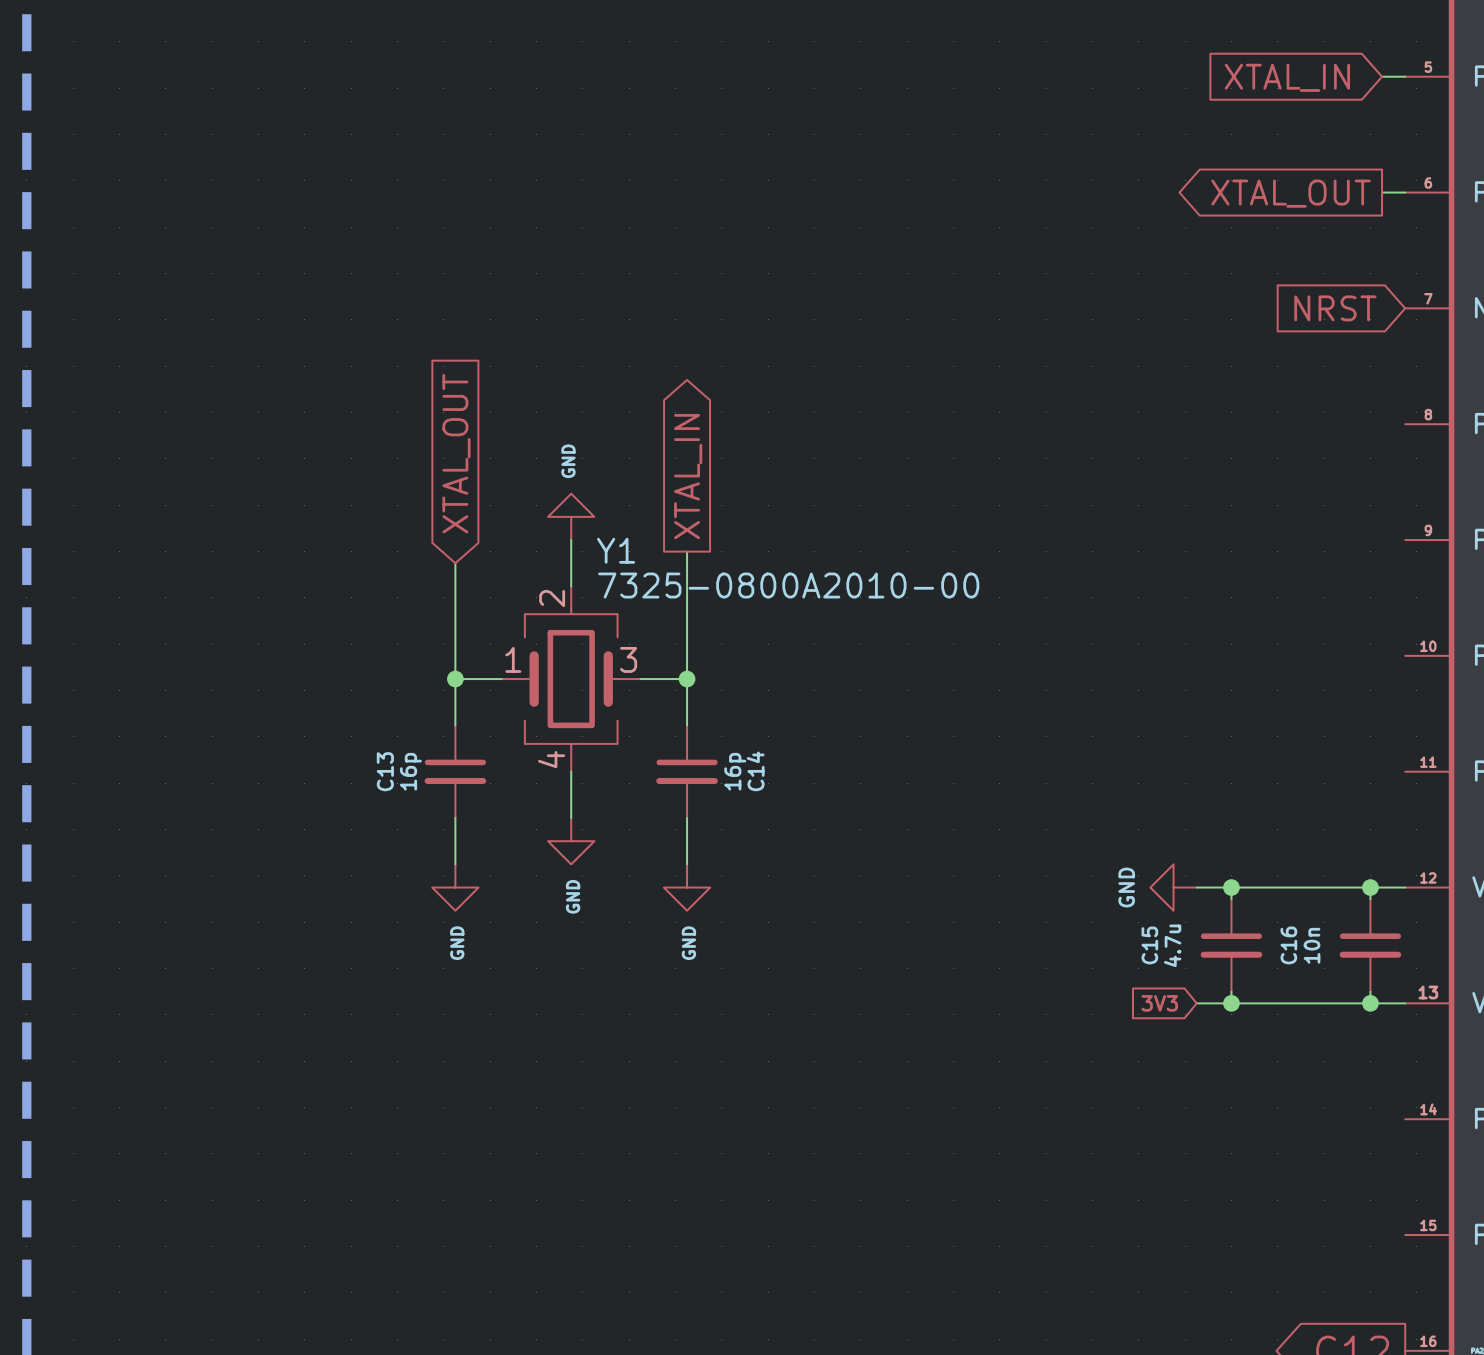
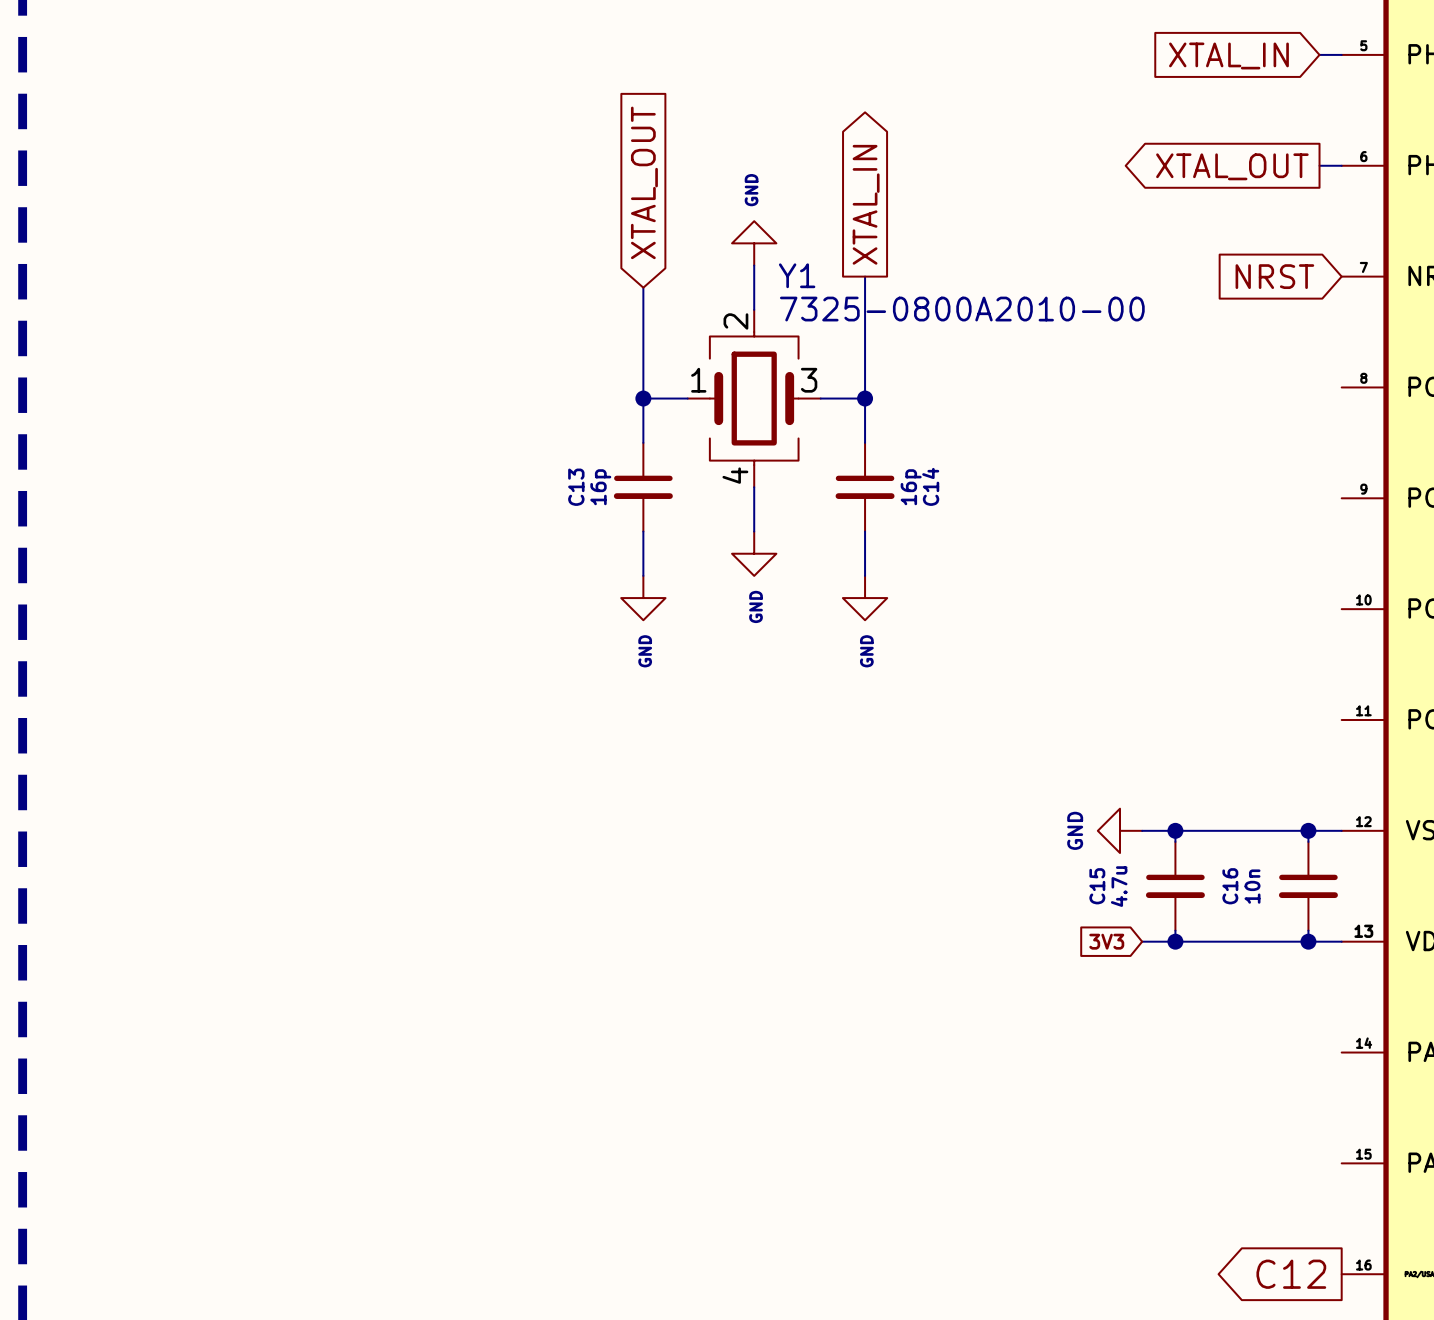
power symbol: none -> GND (754, 243)
junction: none -> (643, 398)
junction: none -> (865, 398)
global label position: XTAL_OUT (456, 453) -> XTAL_OUT (644, 182)
global label position: XTAL_IN (688, 476) -> XTAL_IN (866, 204)
power symbol: GND (571, 516) -> none
wire: (571, 540) (571, 586) -> (754, 265) (754, 309)
wire: (687, 551) (687, 725) -> (865, 276) (865, 442)
wire: (455, 563) (455, 725) -> (643, 287) (643, 442)
power symbol: none -> GND (754, 553)
power symbol: none -> GND (643, 598)
power symbol: none -> GND (865, 598)
wire: (455, 679) (501, 679) -> (643, 398) (687, 398)
junction: (455, 679) -> none
Y1 position: (571, 679) -> (754, 398)
wire: (640, 679) (687, 679) -> (820, 398) (865, 398)
junction: (687, 679) -> none
C13 position: (455, 771) -> (643, 487)
wire: (571, 771) (571, 818) -> (754, 487) (754, 531)
C14 position: (687, 771) -> (865, 487)
wire: (455, 818) (455, 864) -> (643, 531) (643, 575)
wire: (687, 818) (687, 864) -> (865, 531) (865, 575)
power symbol: GND (571, 841) -> none
power symbol: GND (455, 887) -> none
power symbol: GND (687, 887) -> none

